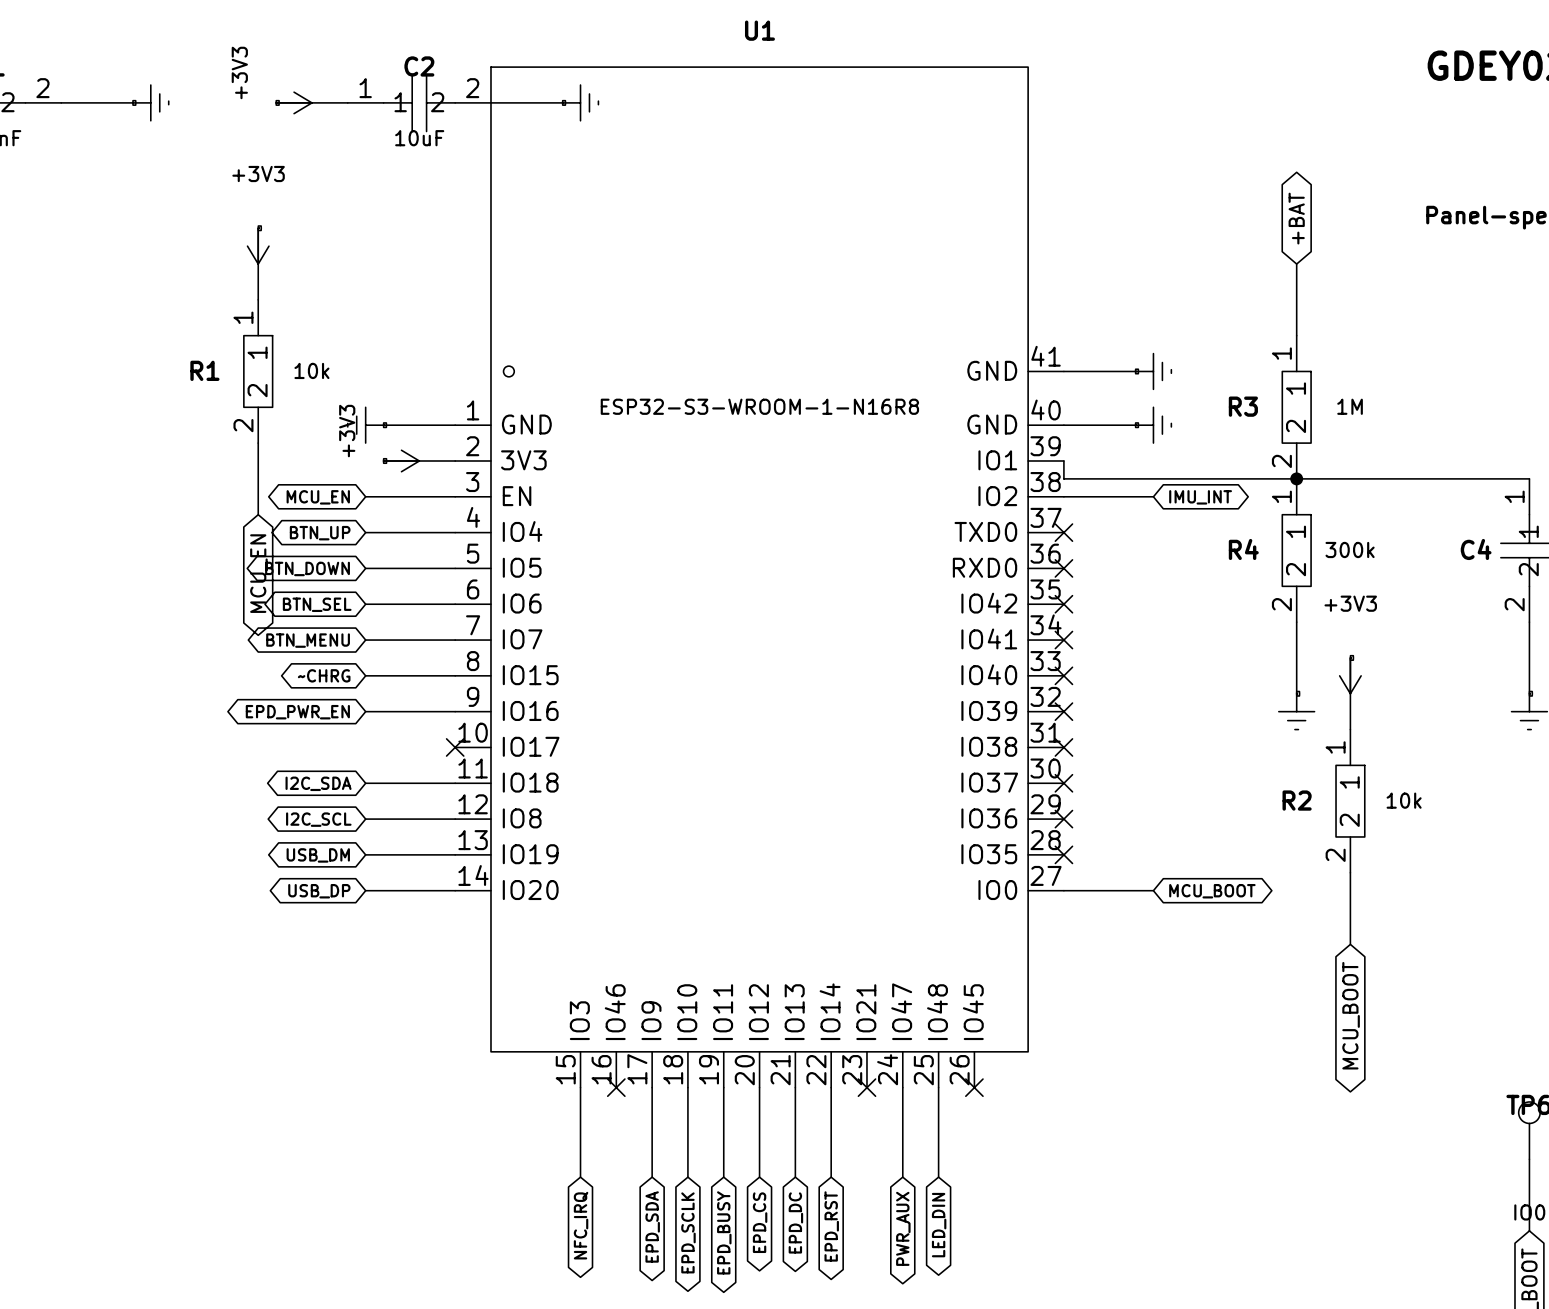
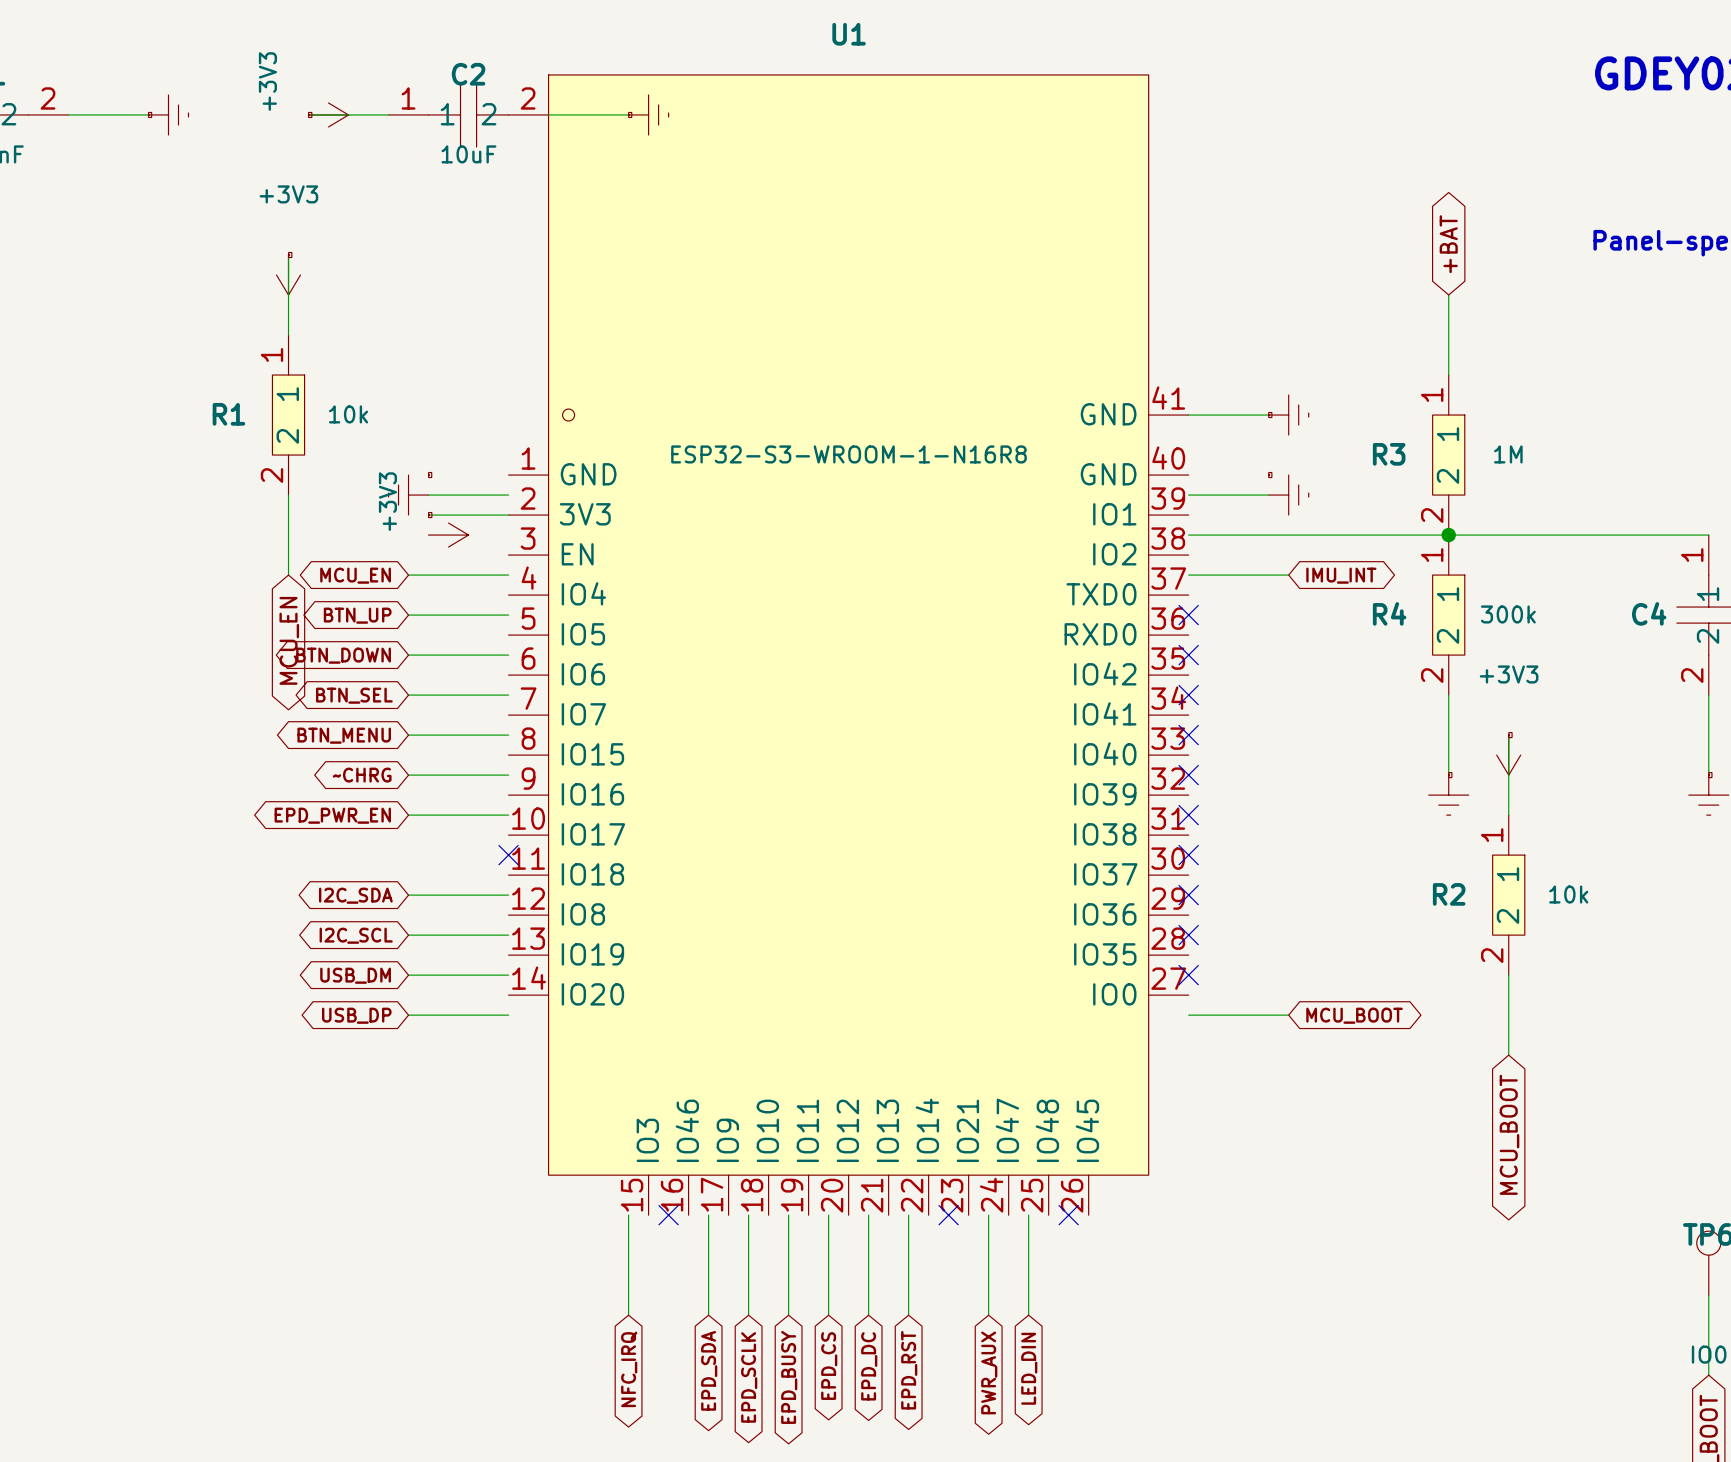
power symbol position: (365, 425) -> (408, 495)
wire: (383, 425) (455, 425) -> (428, 495) (508, 495)
wire: (1063, 425) (1135, 425) -> (1188, 495) (1268, 495)
power symbol position: (1153, 425) -> (1288, 495)
power symbol position: +3V3 (401, 460) -> +3V3 (448, 535)
wire: (1063, 460) (1063, 478) -> none
wire: (365, 496) (455, 496) -> (408, 575) (508, 575)
wire: (1063, 496) (1153, 496) -> (1188, 575) (1288, 575)
global label position: MCU_EN (318, 497) -> MCU_EN (355, 575)
global label position: IMU_INT (1200, 497) -> IMU_INT (1341, 575)
wire: (365, 532) (455, 532) -> (408, 615) (508, 615)
no-connect mark: (1063, 532) -> none
global label position: BTN_UP (320, 533) -> BTN_UP (357, 615)
no-connect mark: none -> (1188, 615)
global label position: BTN_DOWN (307, 568) -> BTN_DOWN (343, 655)
wire: (365, 568) (455, 568) -> (408, 655) (508, 655)
no-connect mark: (1063, 568) -> none
no-connect mark: none -> (1188, 655)
global label position: BTN_SEL (317, 604) -> BTN_SEL (354, 695)
wire: (365, 604) (455, 604) -> (408, 695) (508, 695)
no-connect mark: (1063, 604) -> none
no-connect mark: none -> (1188, 695)
global label position: BTN_MENU (308, 640) -> BTN_MENU (344, 735)
wire: (365, 640) (455, 640) -> (408, 735) (508, 735)
no-connect mark: (1063, 640) -> none
no-connect mark: none -> (1188, 735)
global label position: ~CHRG (324, 675) -> ~CHRG (362, 775)
wire: (365, 675) (455, 675) -> (408, 775) (508, 775)
no-connect mark: (1063, 675) -> none
no-connect mark: none -> (1188, 775)
wire: (365, 711) (455, 711) -> (408, 815) (508, 815)
no-connect mark: (1063, 711) -> none
global label position: EPD_PWR_EN (297, 712) -> EPD_PWR_EN (332, 815)
no-connect mark: none -> (1188, 815)
no-connect mark position: (455, 747) -> (508, 855)
no-connect mark: (1063, 747) -> none
no-connect mark: none -> (1188, 855)
global label position: I2C_SDA (318, 783) -> I2C_SDA (355, 895)
wire: (365, 783) (455, 783) -> (408, 895) (508, 895)
no-connect mark: (1063, 783) -> none
no-connect mark: none -> (1188, 895)
global label position: I2C_SCL (318, 819) -> I2C_SCL (356, 935)
wire: (365, 819) (455, 819) -> (408, 935) (508, 935)
no-connect mark: (1063, 819) -> none
no-connect mark: none -> (1188, 935)
wire: (365, 854) (455, 854) -> (408, 975) (508, 975)
no-connect mark: (1063, 854) -> none
global label position: USB_DM (318, 855) -> USB_DM (355, 975)
no-connect mark: none -> (1188, 975)
wire: (365, 890) (455, 890) -> (408, 1015) (508, 1015)
wire: (1063, 890) (1153, 890) -> (1188, 1015) (1288, 1015)
global label position: USB_DP (319, 891) -> USB_DP (356, 1015)
global label position: MCU_BOOT (1212, 891) -> MCU_BOOT (1354, 1015)
wire: (580, 1087) (580, 1177) -> (628, 1215) (628, 1315)
no-connect mark position: (616, 1087) -> (668, 1215)
wire: (652, 1087) (652, 1177) -> (708, 1215) (708, 1315)
wire: (687, 1087) (687, 1177) -> (748, 1215) (748, 1315)
wire: (723, 1087) (723, 1177) -> (788, 1215) (788, 1315)
wire: (759, 1087) (759, 1177) -> (828, 1215) (828, 1315)
wire: (795, 1087) (795, 1177) -> (868, 1215) (868, 1315)
wire: (831, 1087) (831, 1177) -> (908, 1215) (908, 1315)
no-connect mark position: (866, 1087) -> (948, 1215)
wire: (902, 1087) (902, 1177) -> (988, 1215) (988, 1315)
wire: (938, 1087) (938, 1177) -> (1028, 1215) (1028, 1315)
no-connect mark position: (974, 1087) -> (1068, 1215)
global label position: EPD_CS (760, 1222) -> EPD_CS (829, 1366)
global label position: EPD_DC (795, 1222) -> EPD_DC (869, 1366)
global label position: NFC_IRQ (581, 1225) -> NFC_IRQ (629, 1369)
global label position: LED_DIN (939, 1225) -> LED_DIN (1029, 1368)
global label position: EPD_SDA (652, 1226) -> EPD_SDA (709, 1370)
global label position: EPD_RST (831, 1226) -> EPD_RST (909, 1370)
global label position: PWR_AUX (903, 1228) -> PWR_AUX (989, 1372)
global label position: EPD_SCLK (688, 1232) -> EPD_SCLK (749, 1377)
global label position: EPD_BUSY (724, 1232) -> EPD_BUSY (789, 1377)

